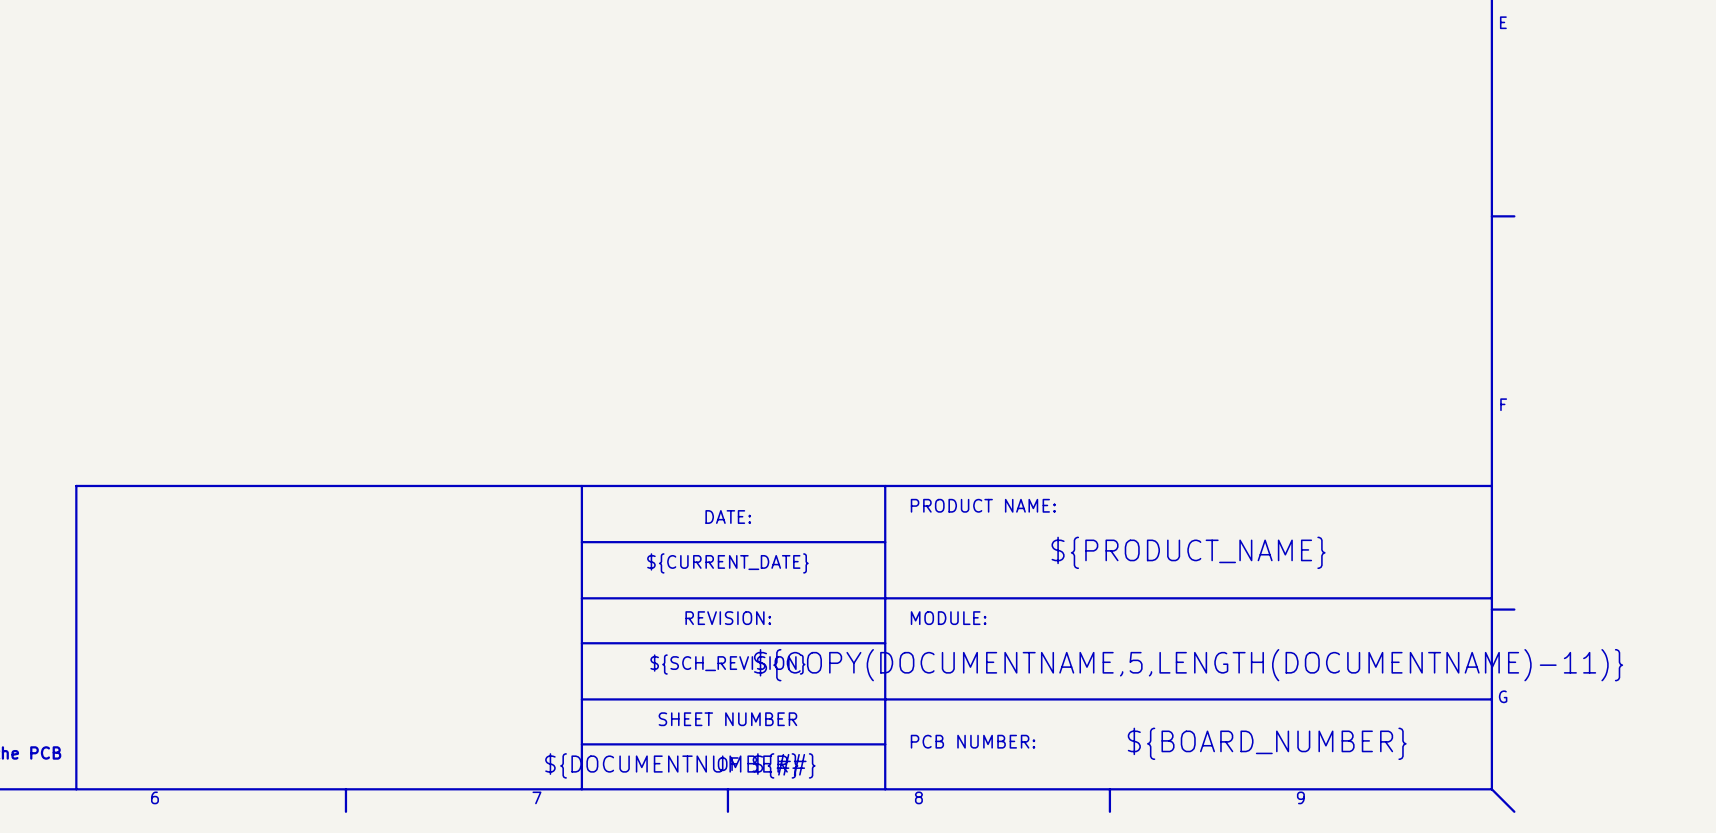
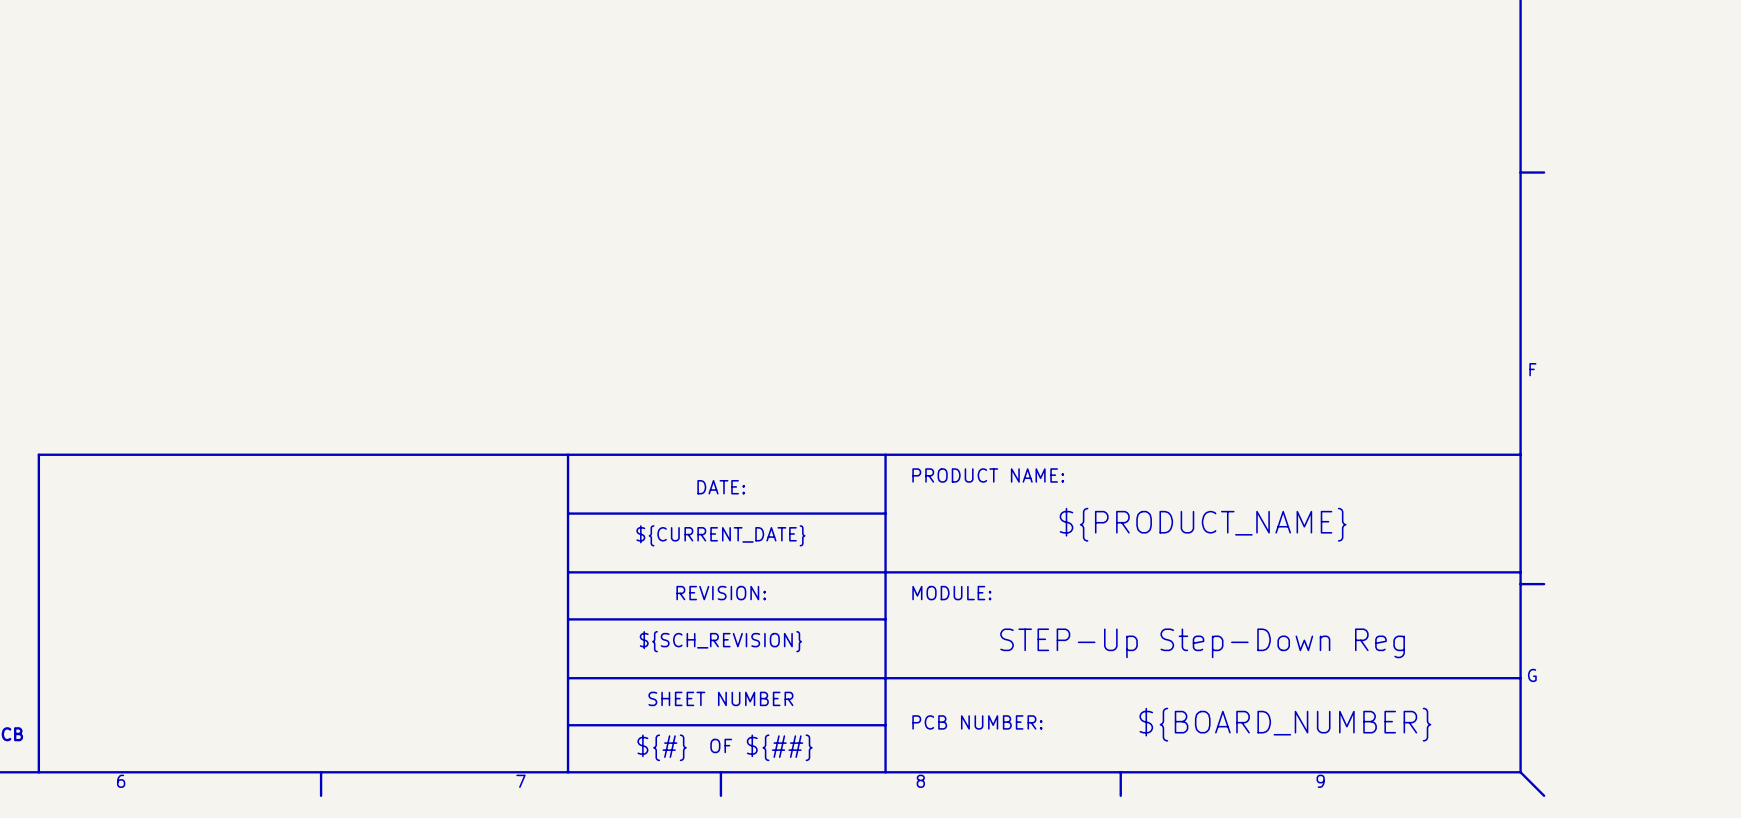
text: ${COPY(DOCUMENTNAME,5,LENGTH(DOCUMENTNAME)-11)} (1188, 665) -> STEP-Up Step-Down Reg (1202, 643)
text: ${DOCUMENTNUMBER} (671, 765) -> ${#} (662, 747)

